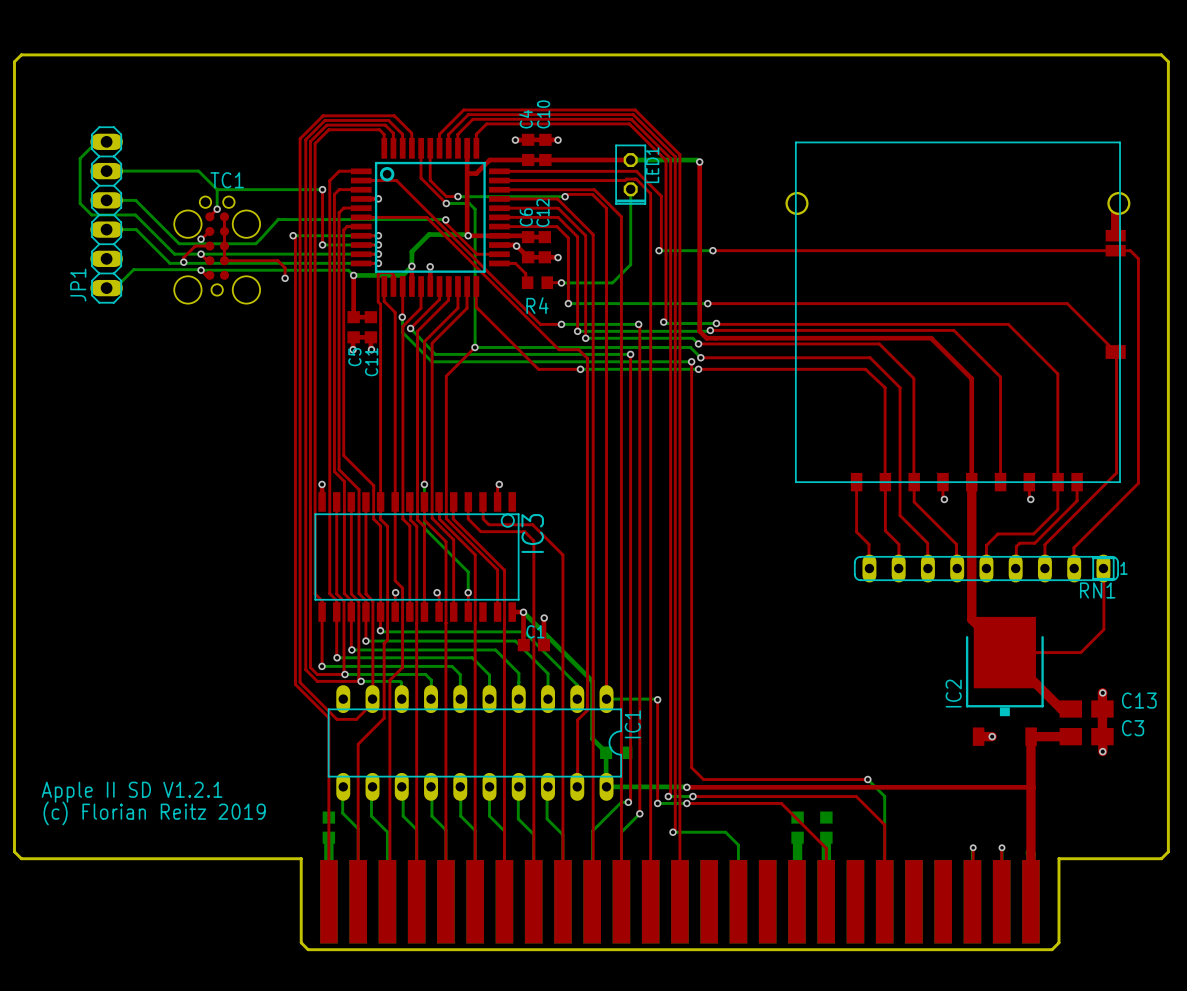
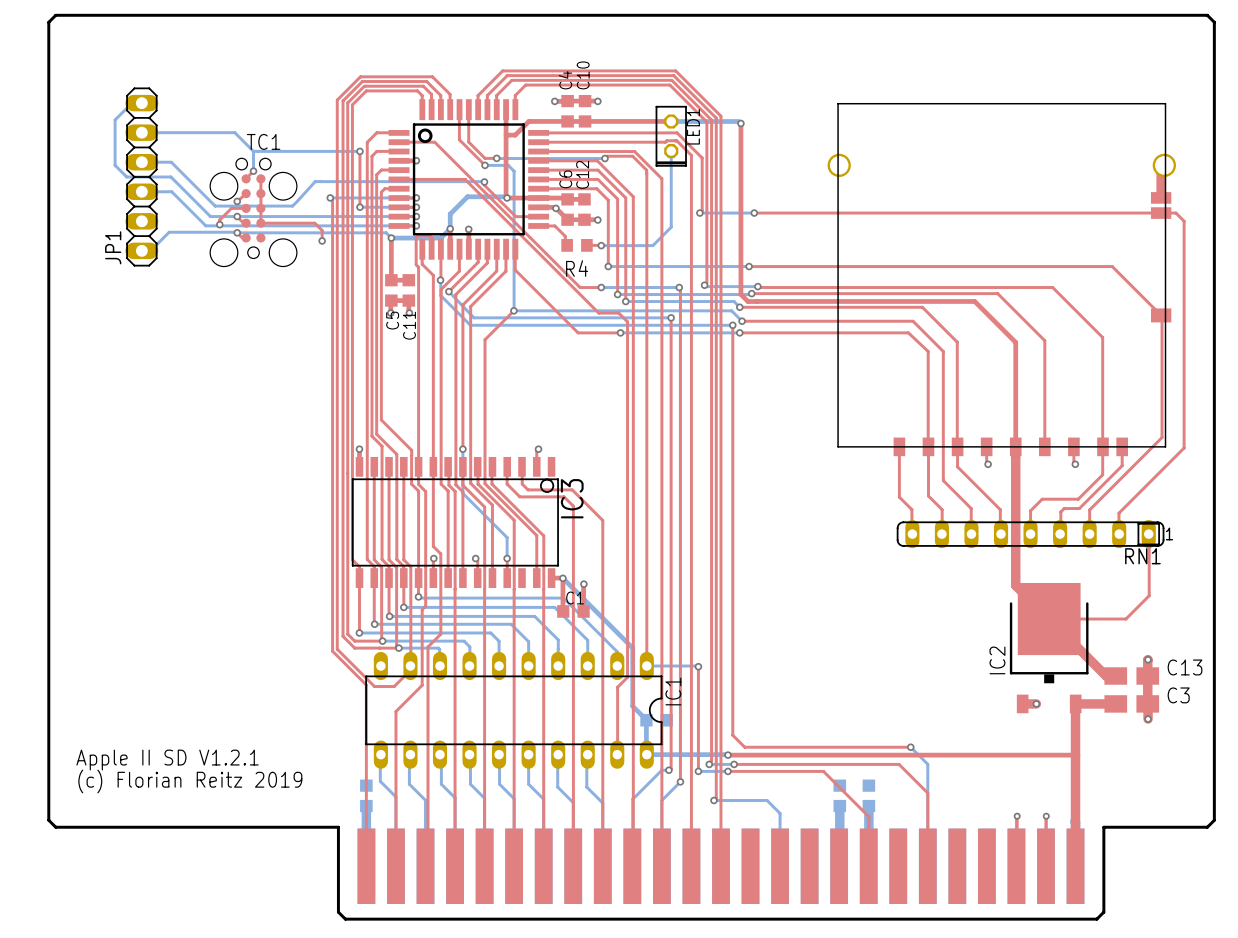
part footprint: [320, 860, 1040, 944] -> [357, 828, 1085, 904]

